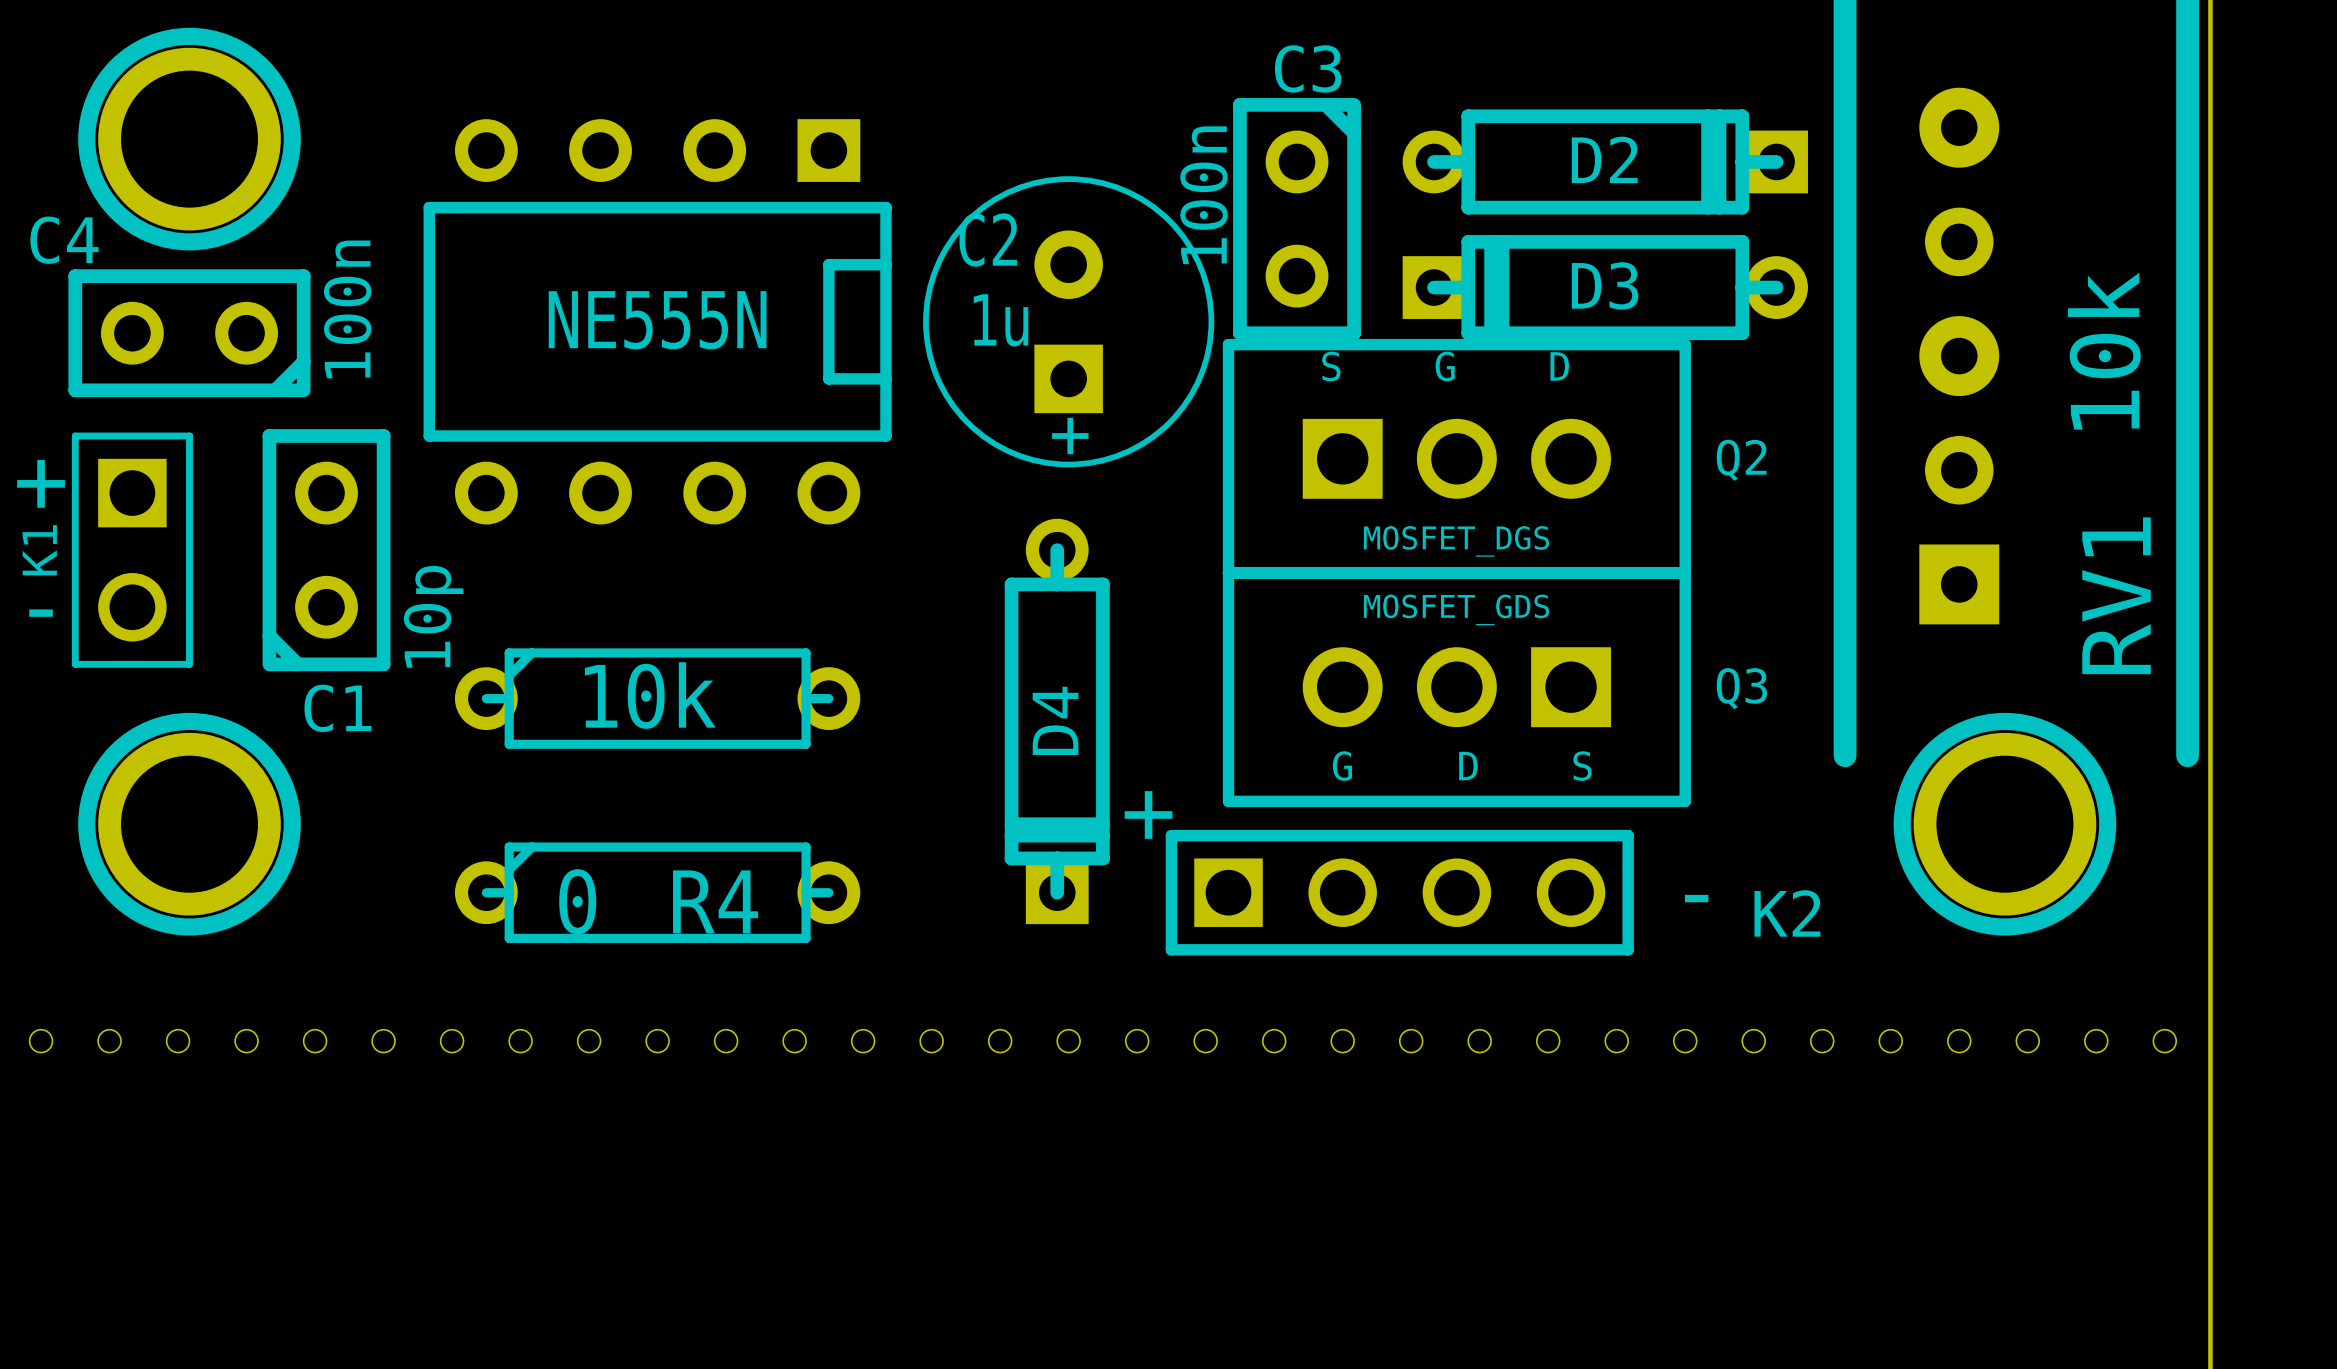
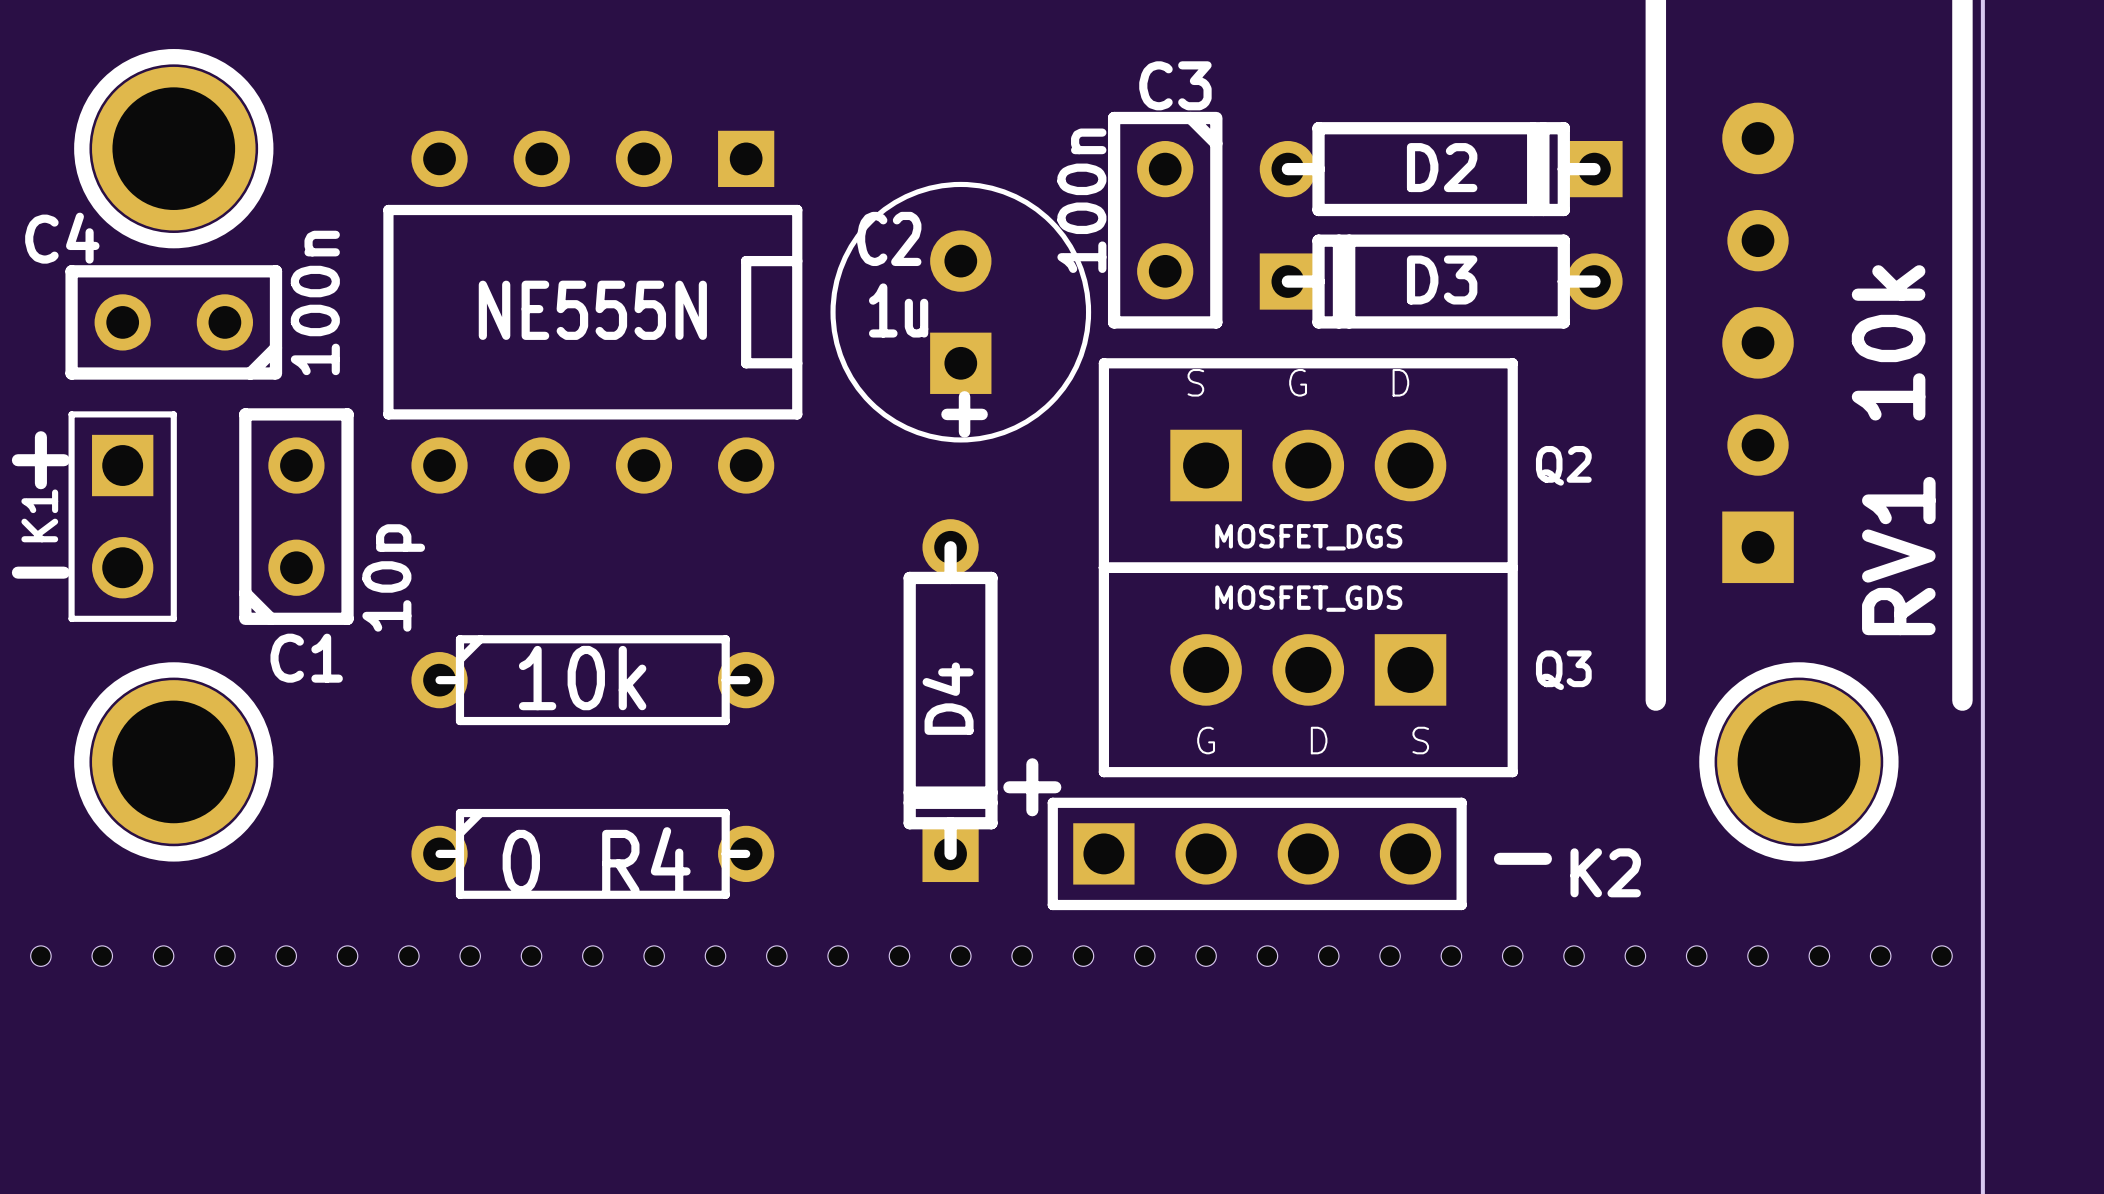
Q2 position: (1456, 458) -> (1308, 465)
Q3 position: (1456, 687) -> (1308, 669)
part position: (657, 698) -> (592, 680)
D4 position: (1057, 721) -> (950, 700)
text position: + (1148, 814) -> + (1032, 787)
R4 position: (657, 892) -> (592, 853)
K2 position: (1399, 892) -> (1257, 853)
text position: - (1696, 898) -> - (1522, 858)

